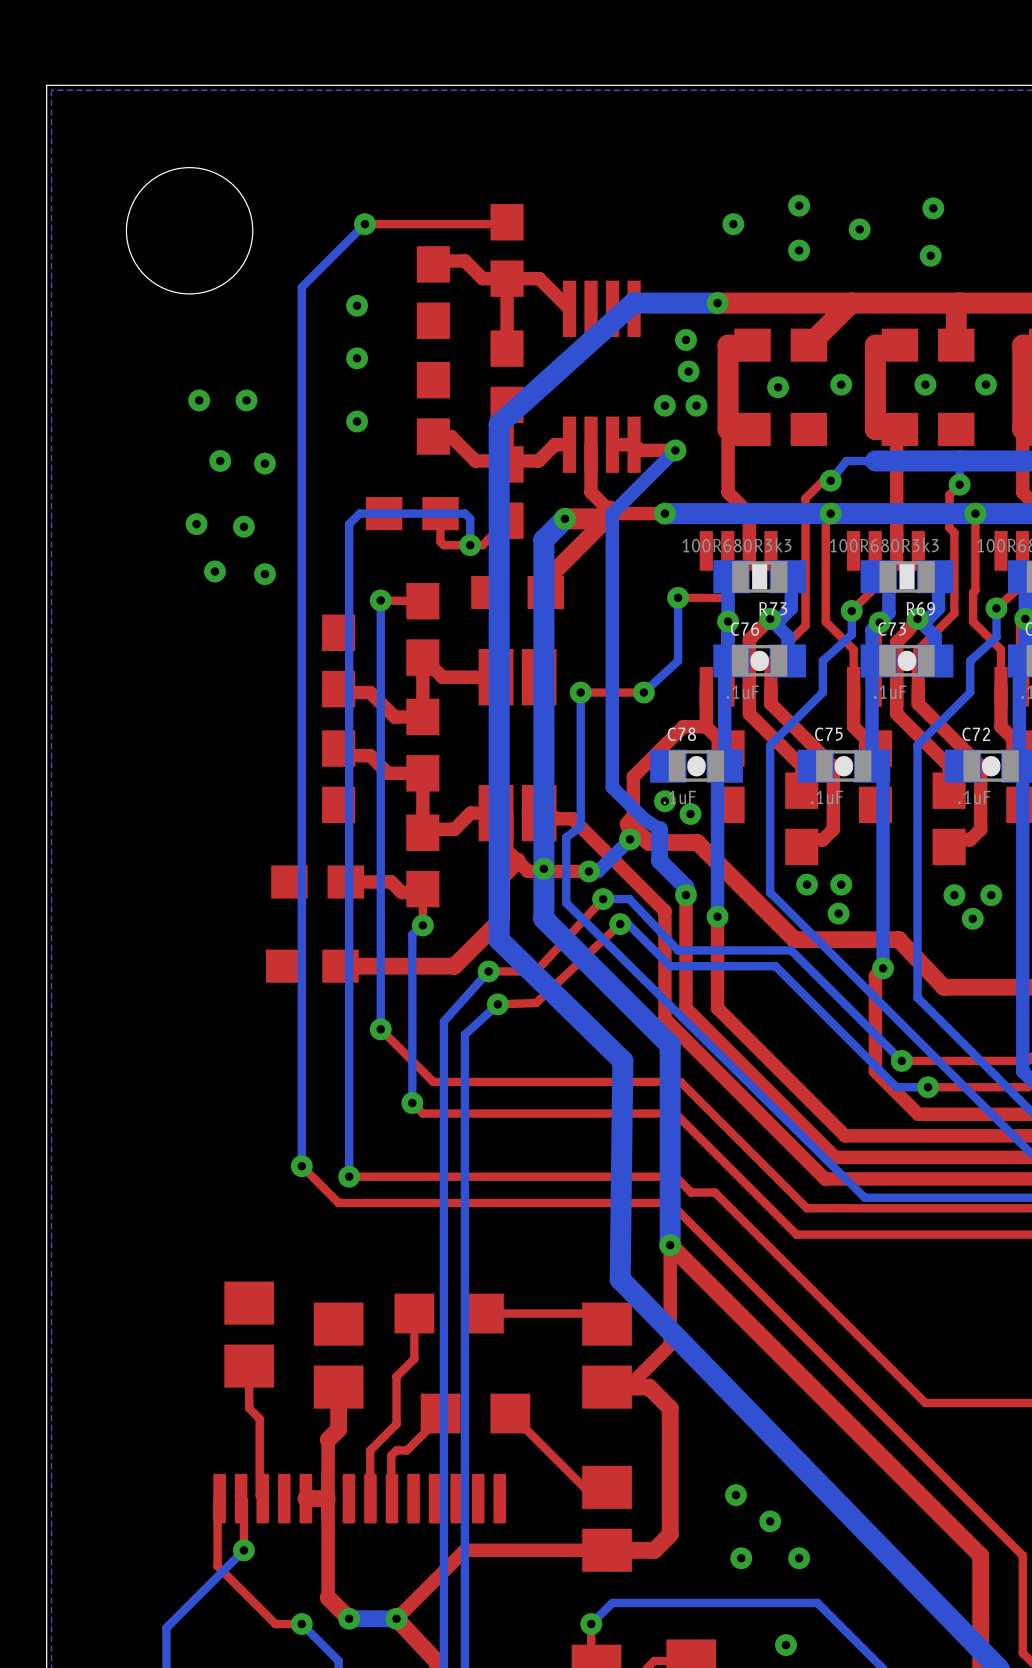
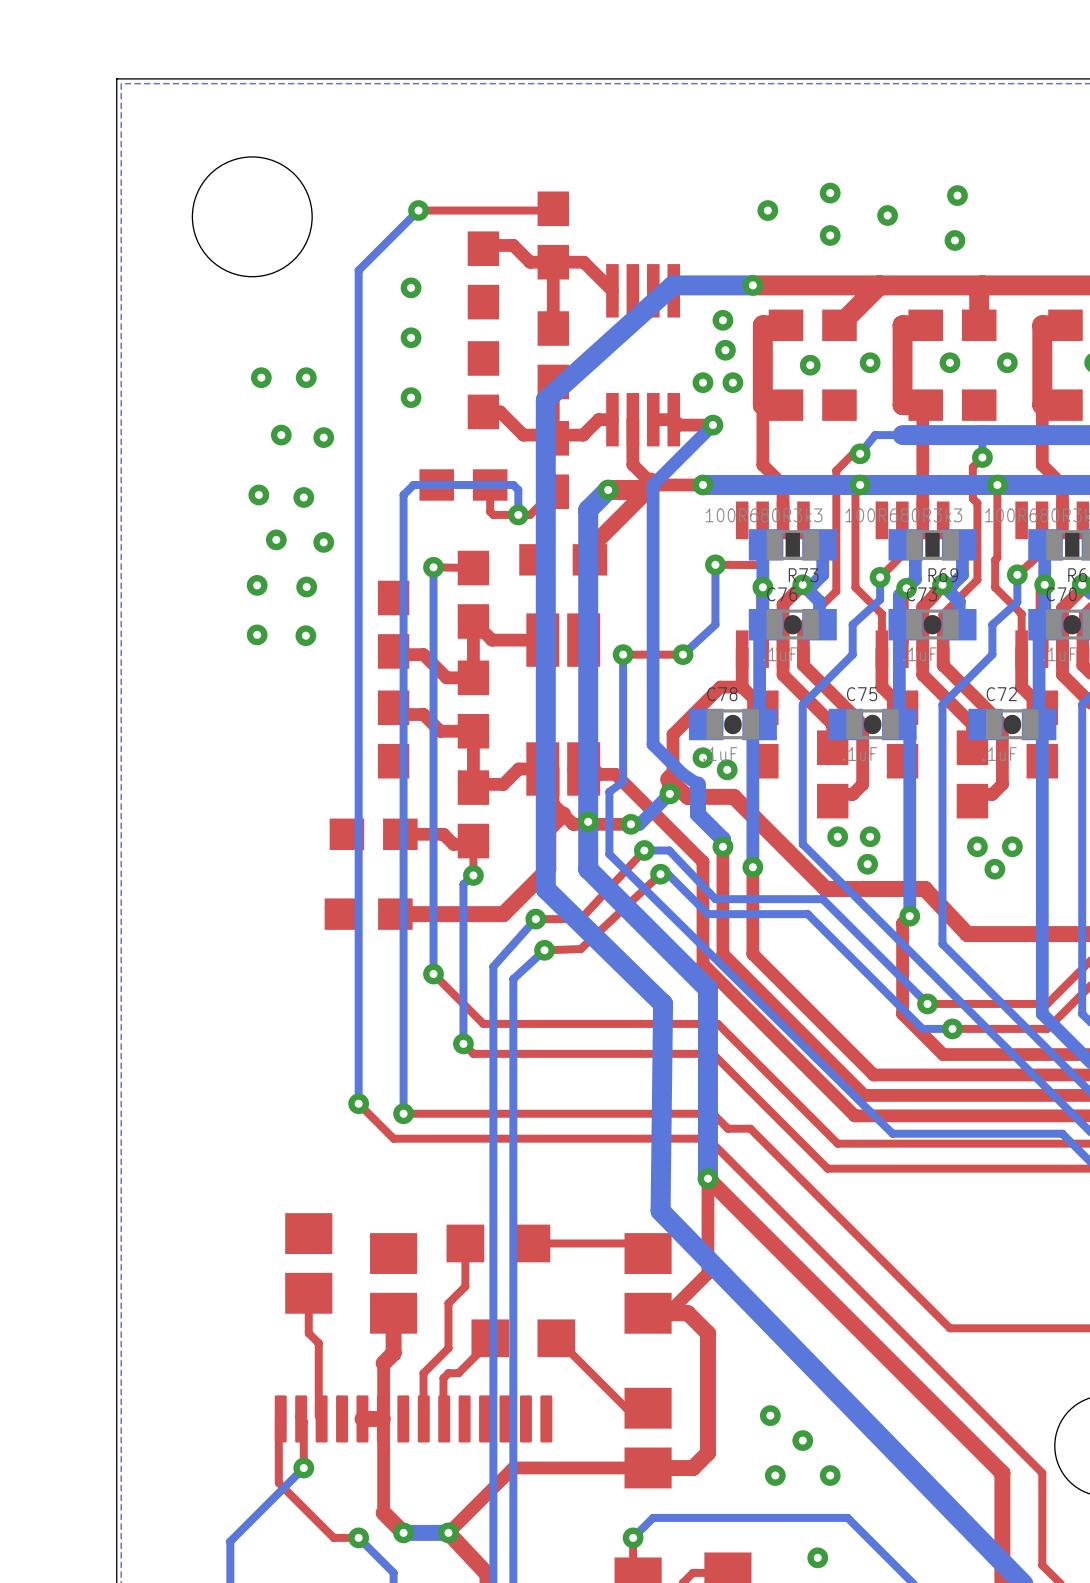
via: none -> (257, 585)
via: none -> (306, 586)
via: none -> (257, 634)
via: none -> (305, 635)

